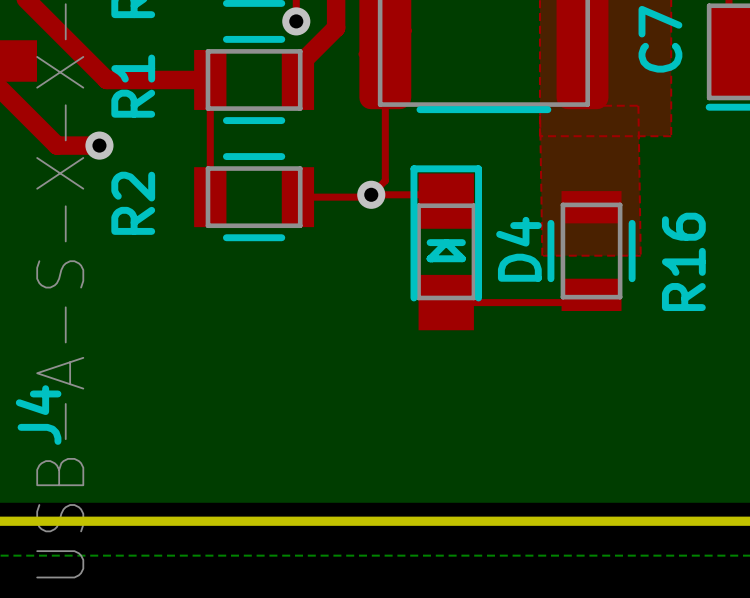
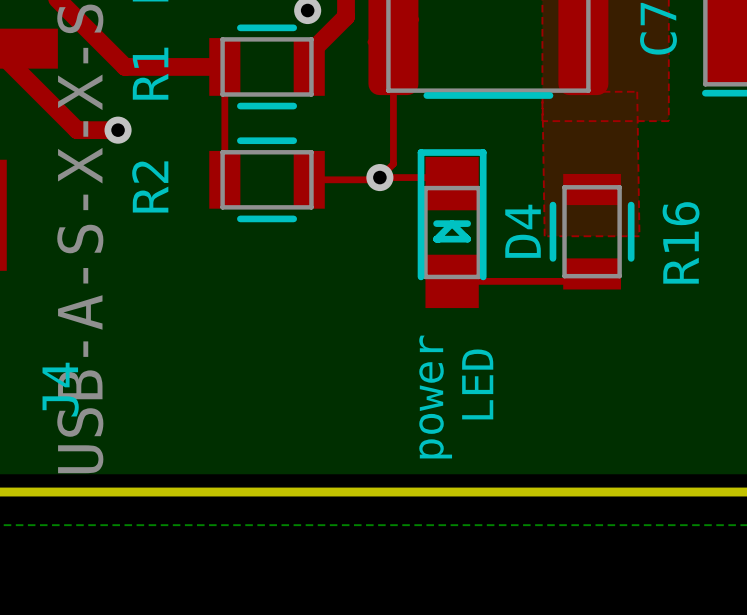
text: none -> LED (477, 384)
text: none -> power (435, 397)

